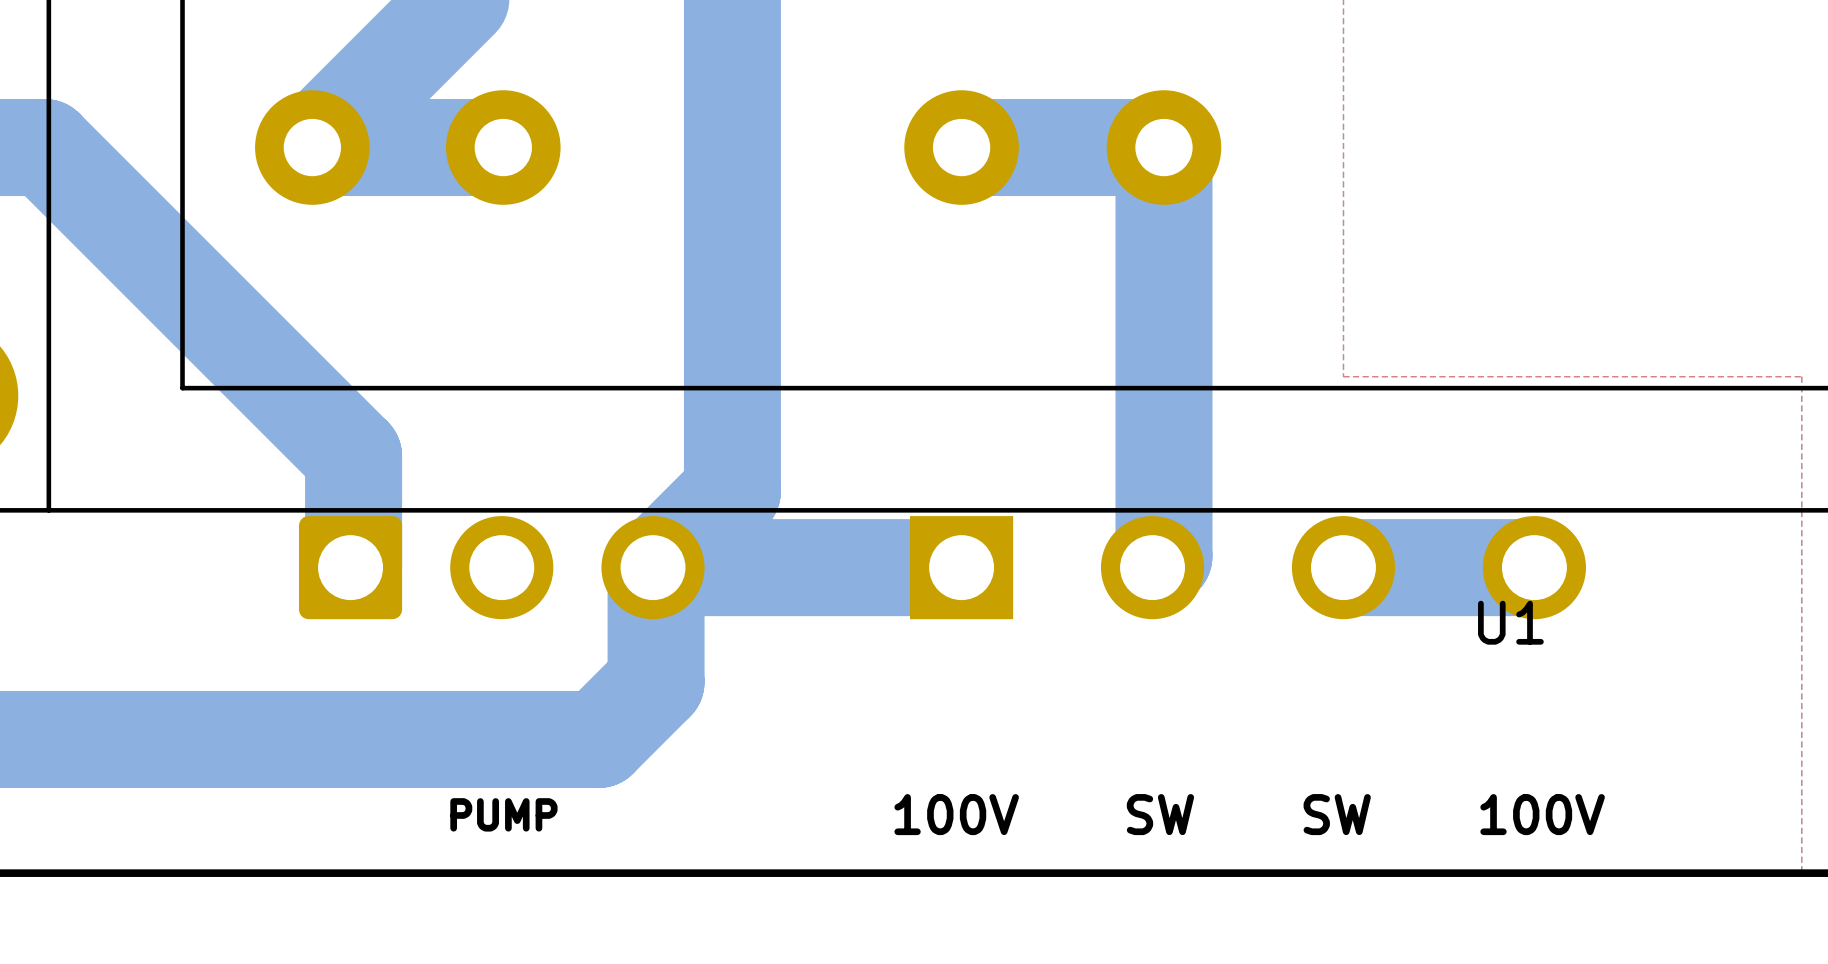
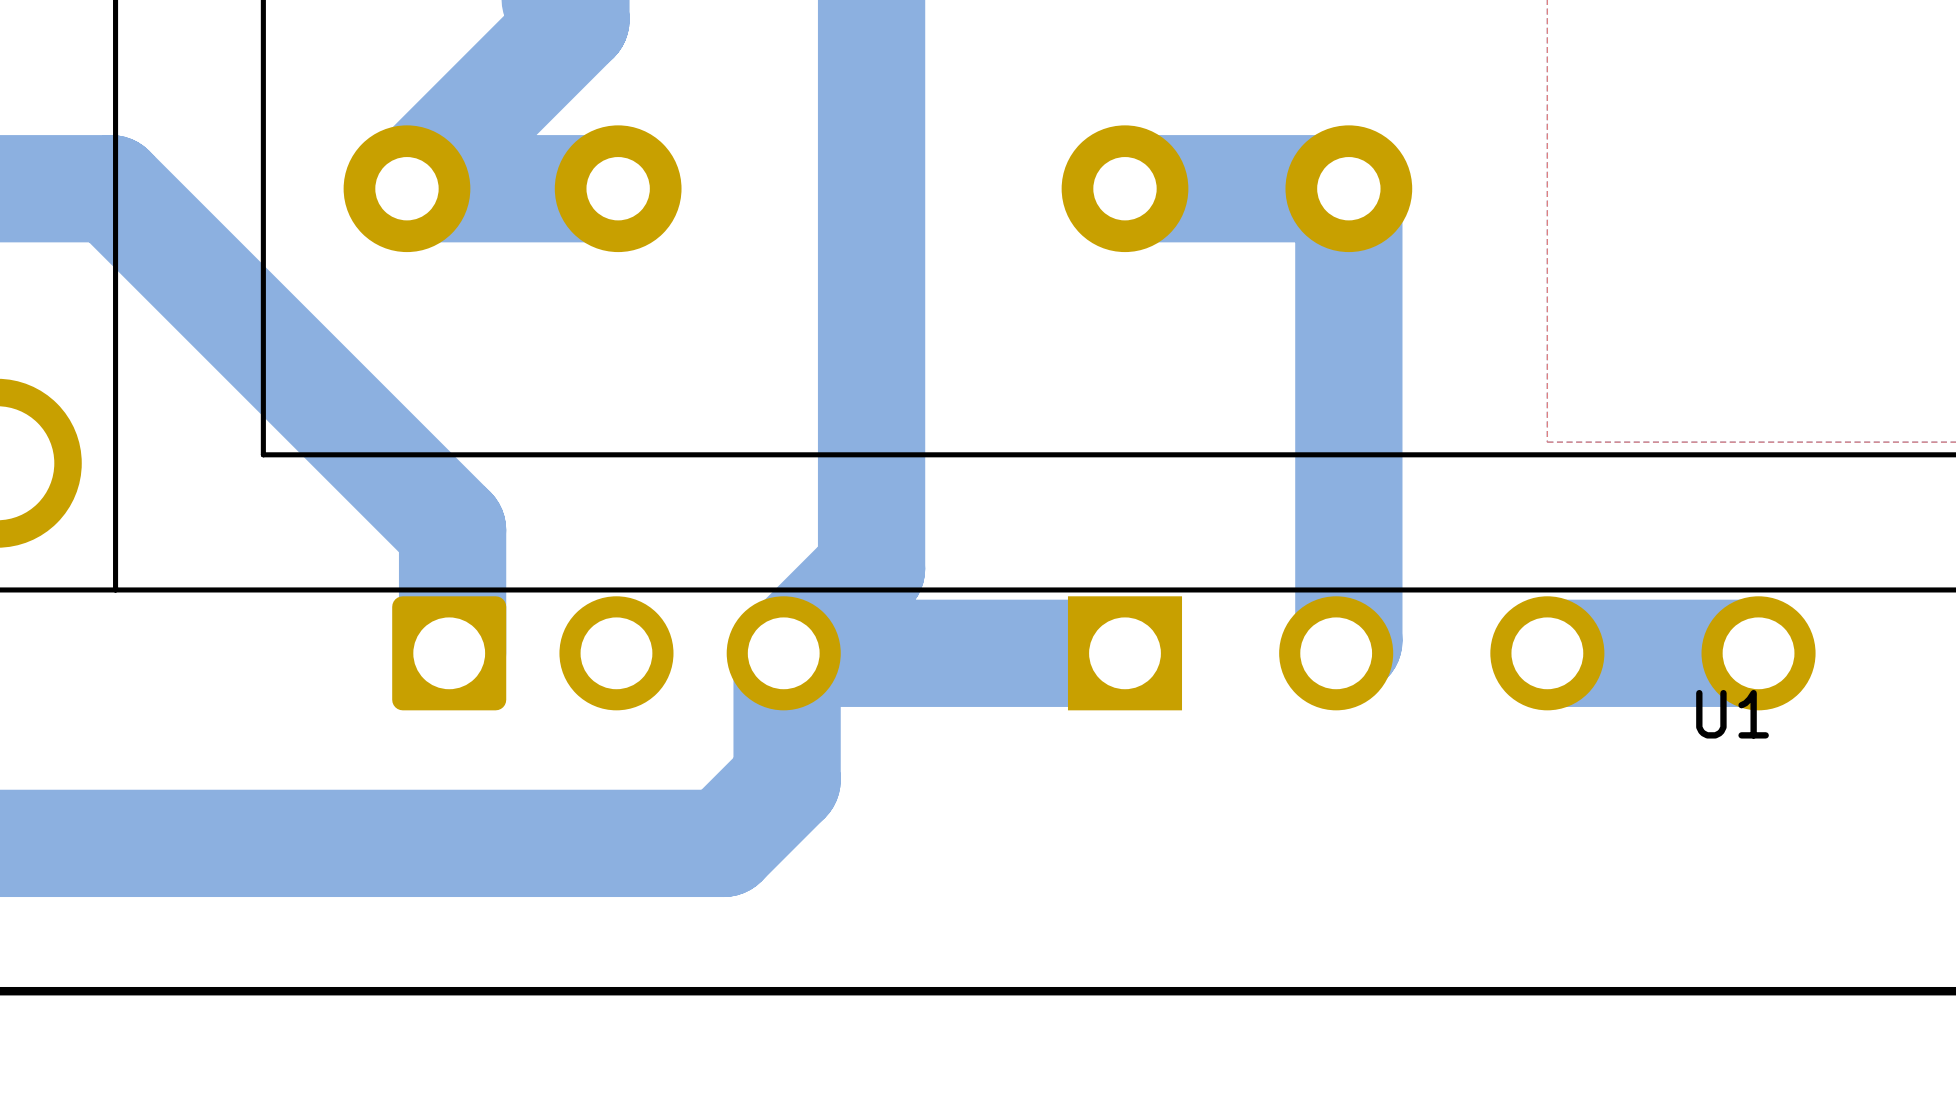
text: PUMP (503, 814) -> none
text: 100V SW SW 100V (1249, 814) -> none

